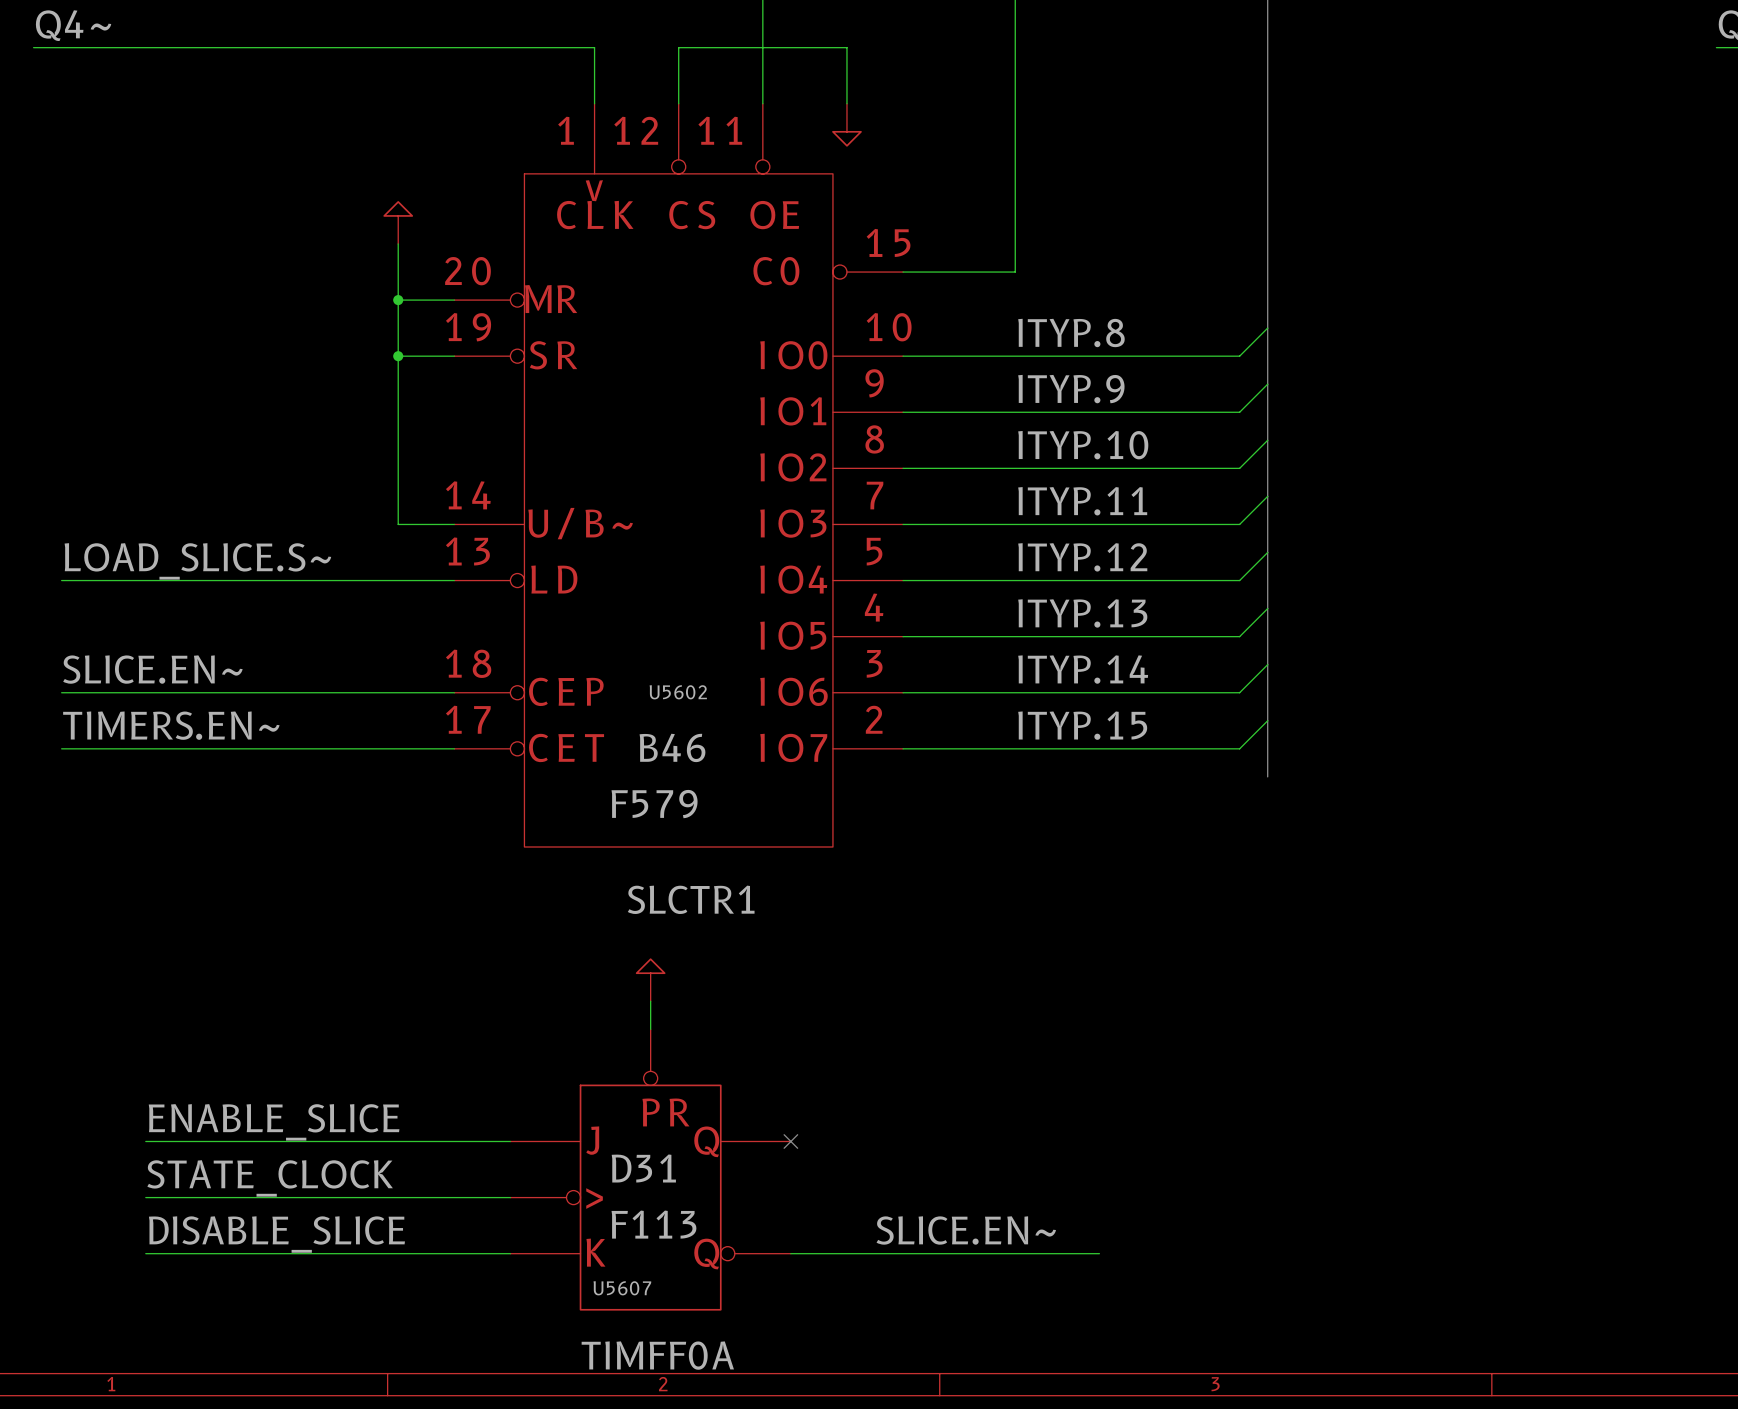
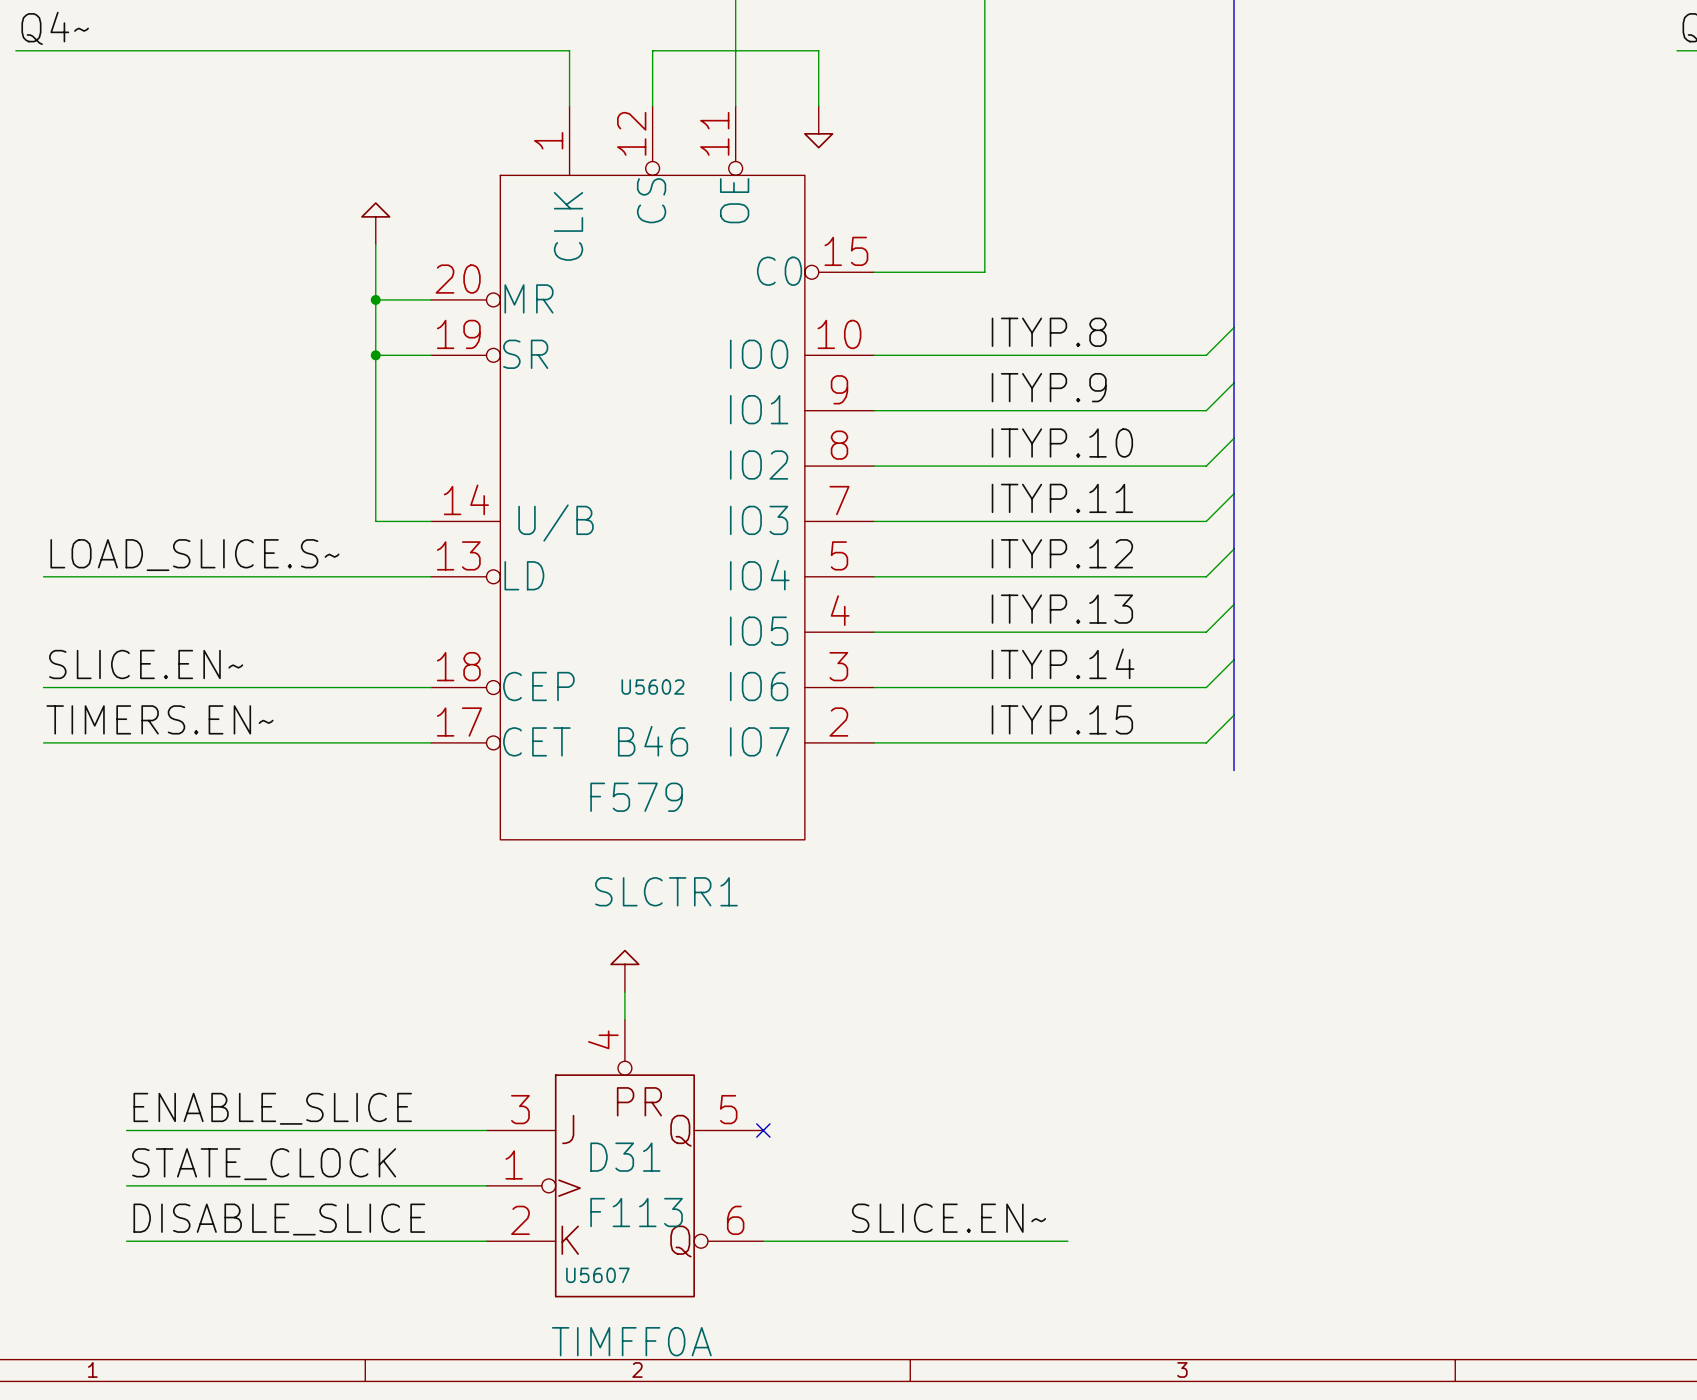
U5602 symbol: [454, 103, 904, 848] -> [431, 106, 875, 840]
U5607 pin number: none -> 4 (603, 1039)
U5607 pin number: none -> 3 (520, 1109)
U5607 pin number: none -> 5 (728, 1109)
U5607 pin number: none -> 1 (514, 1164)
U5607 pin number: none -> 2 (520, 1220)
U5607 pin number: none -> 6 (735, 1220)

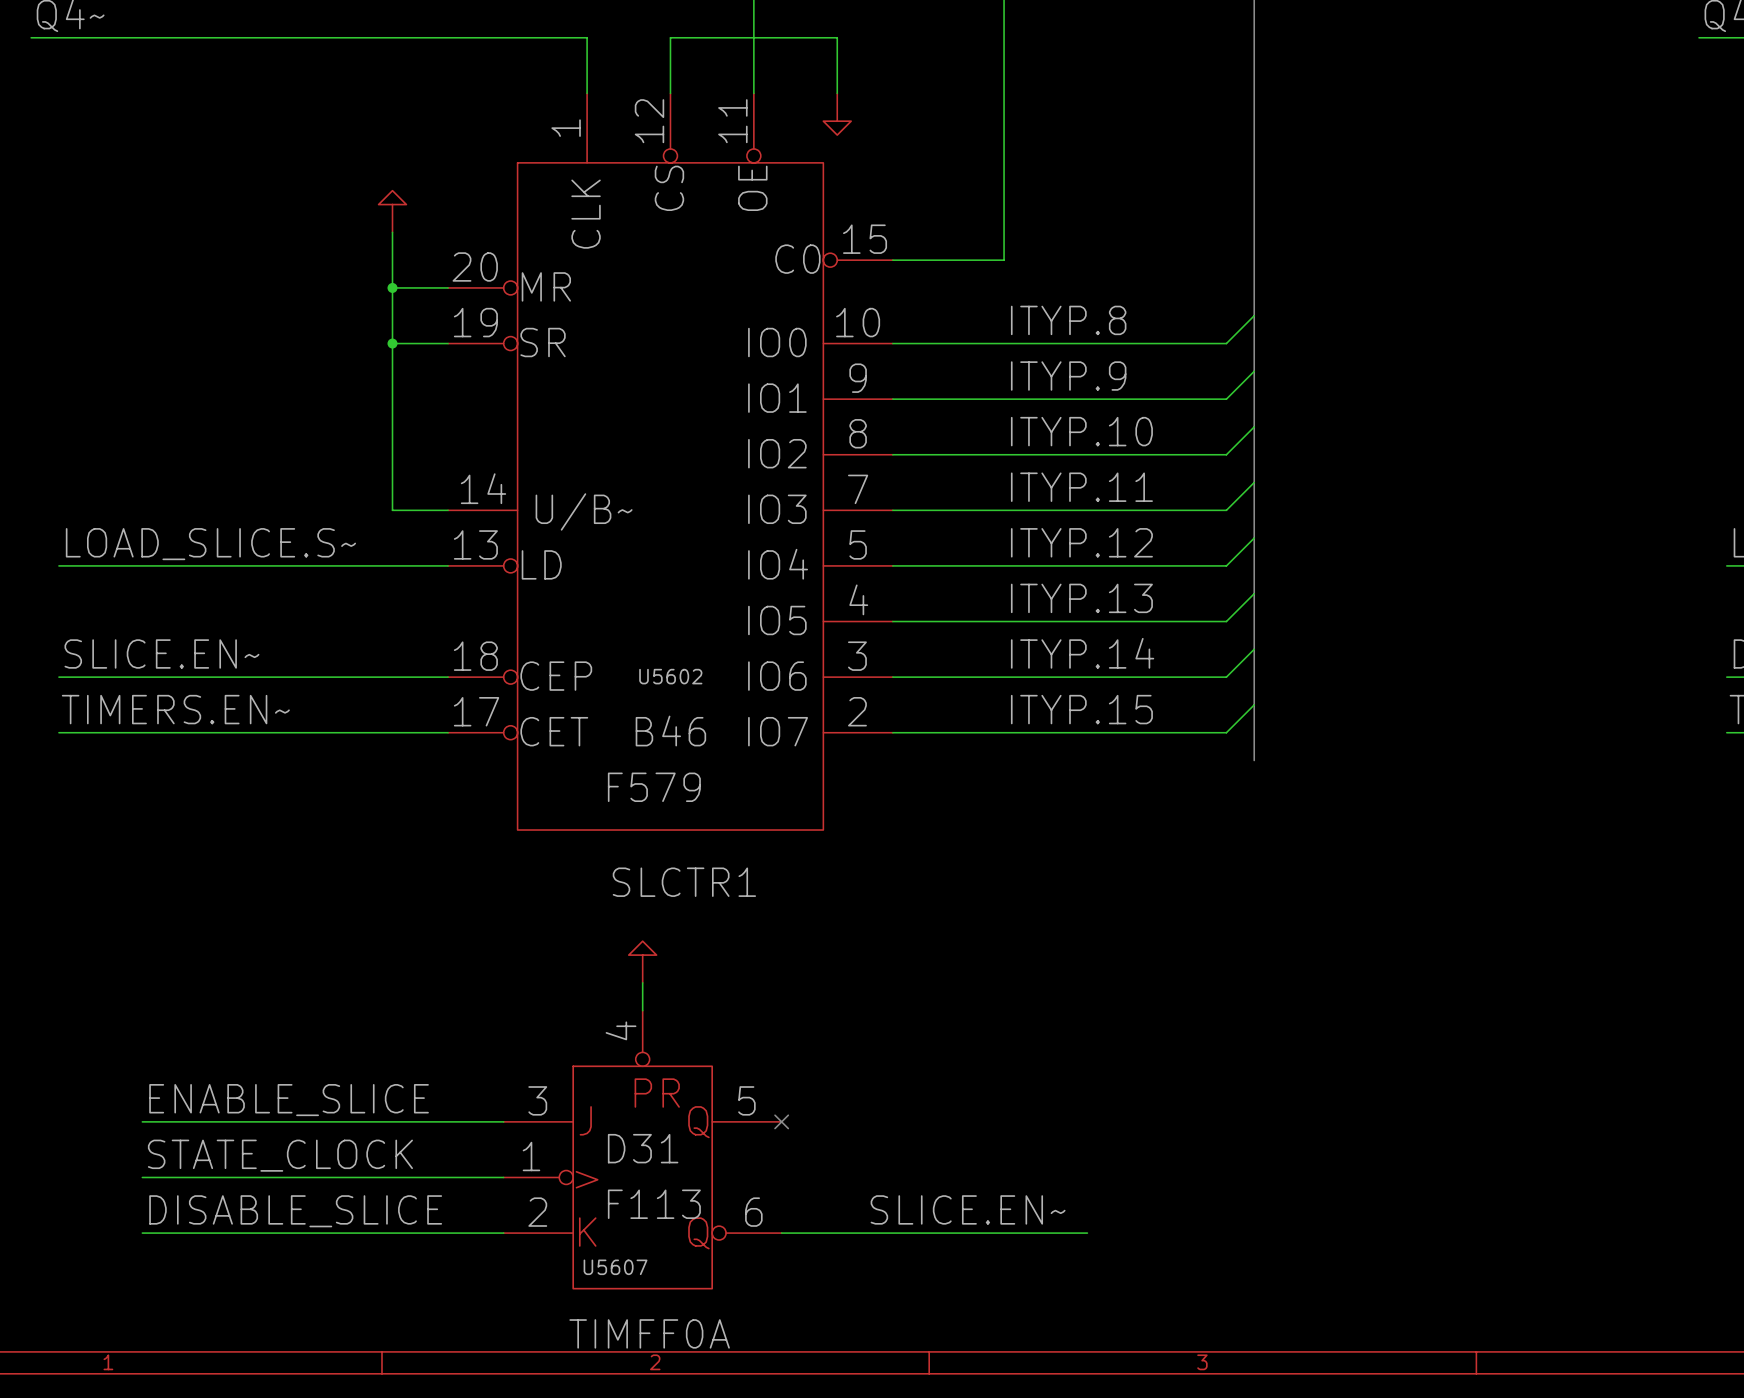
U5602 pin name: U/B (556, 523) -> U/B~ (584, 511)

